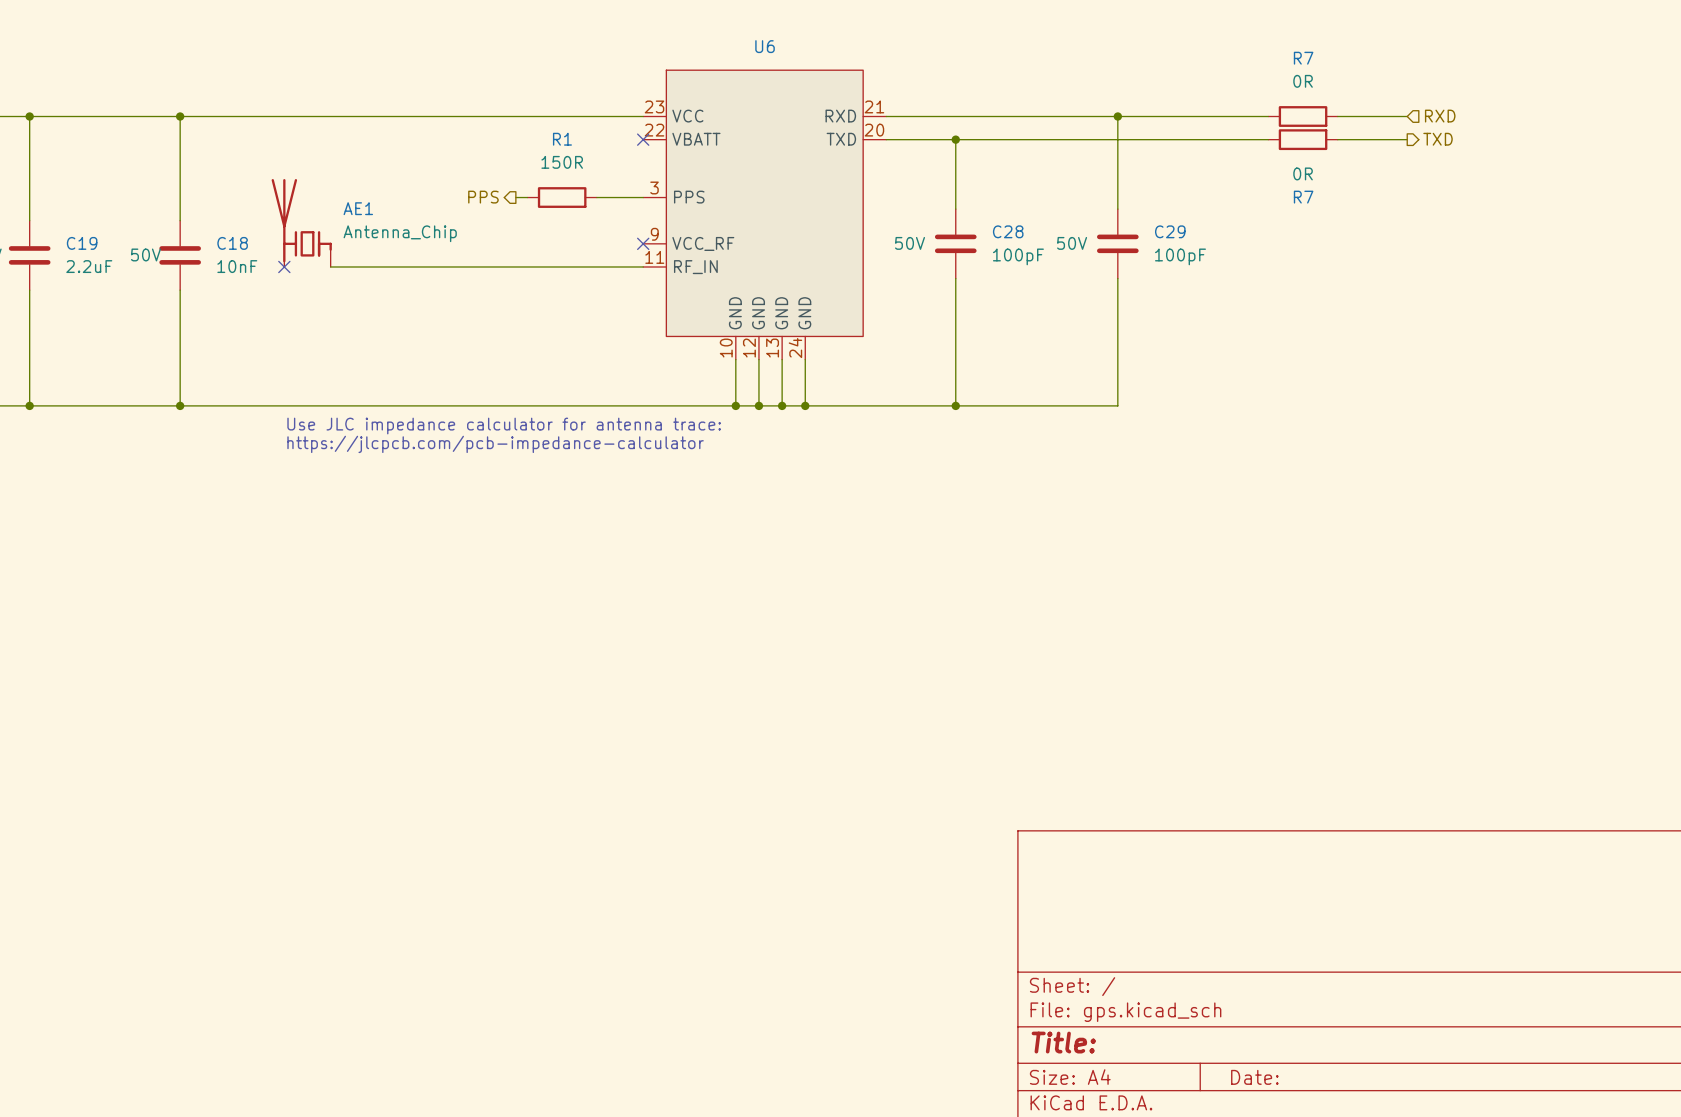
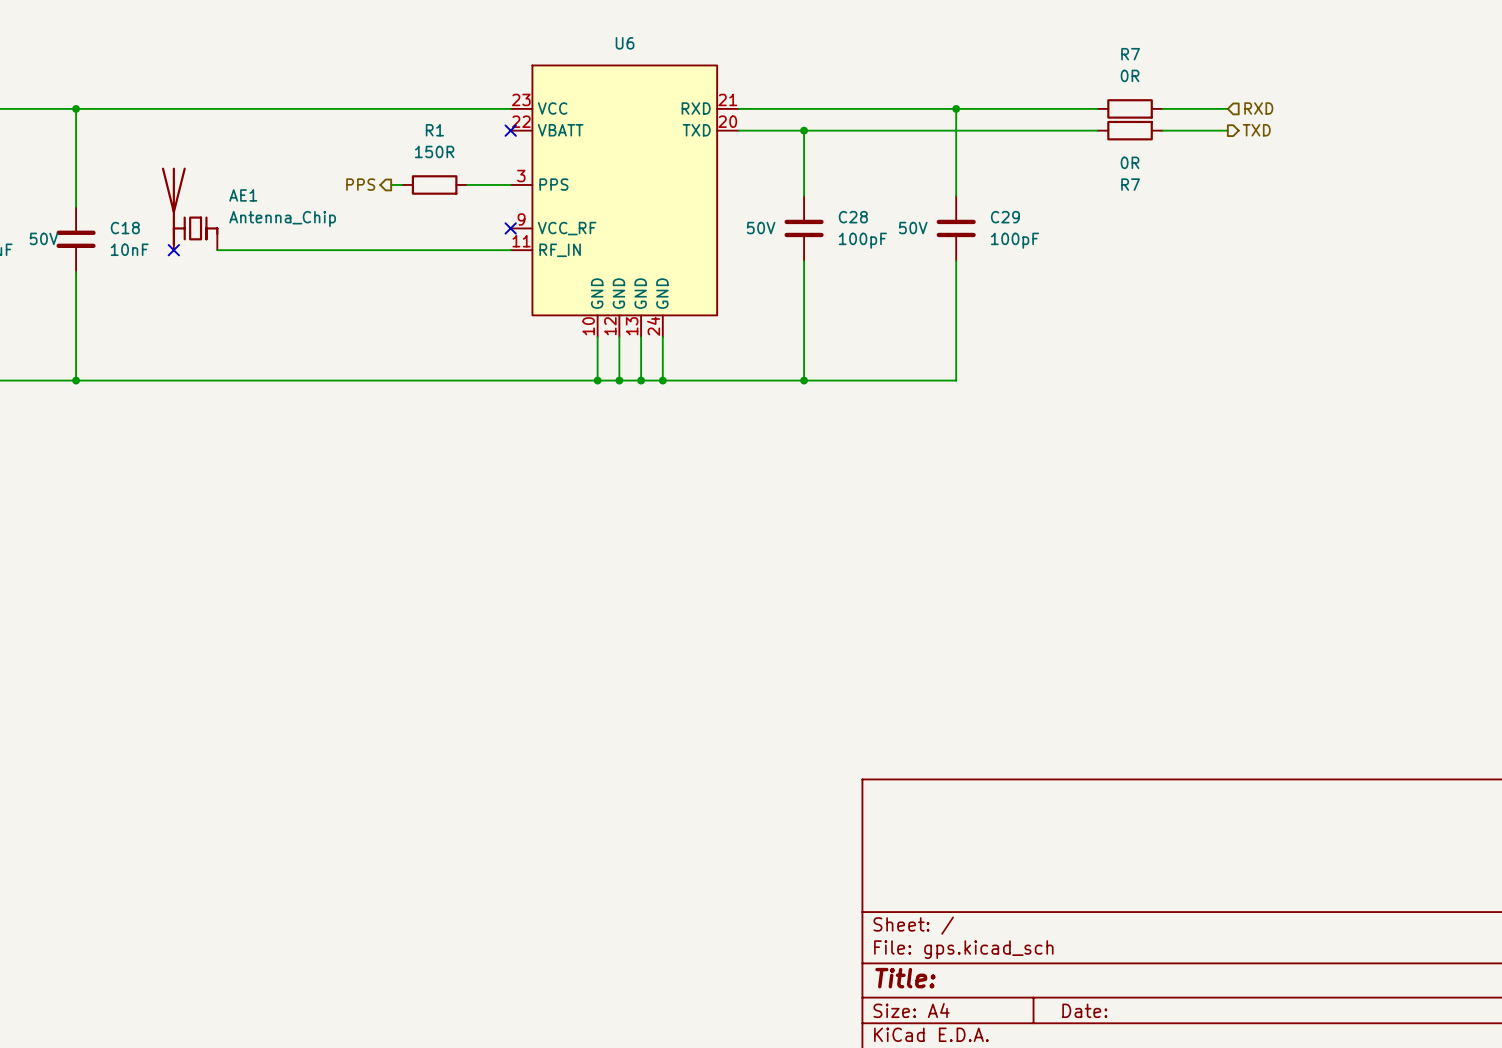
text: Use JLC impedance calculator for antenna trace: (504, 426) -> none
text: https://jlcpcb.com/pcb-impedance-calculator (495, 444) -> none

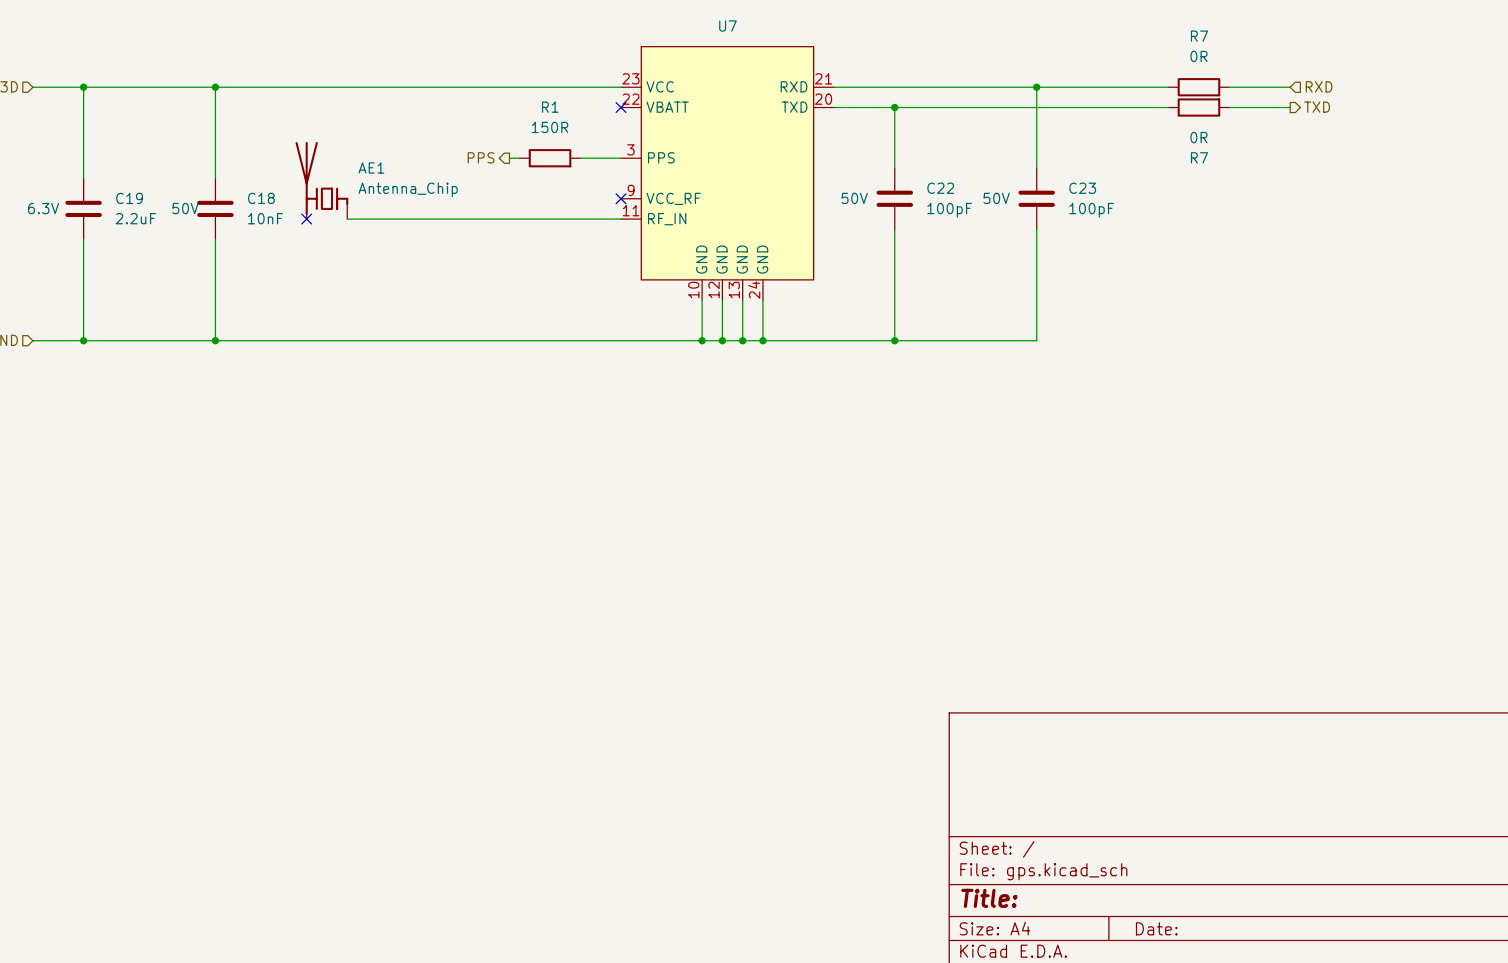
U6 name: U6 (625, 43) -> U7 (727, 26)
C28 name: C28 (853, 217) -> C22 (940, 188)
C29 name: C29 (1005, 217) -> C23 (1082, 188)

